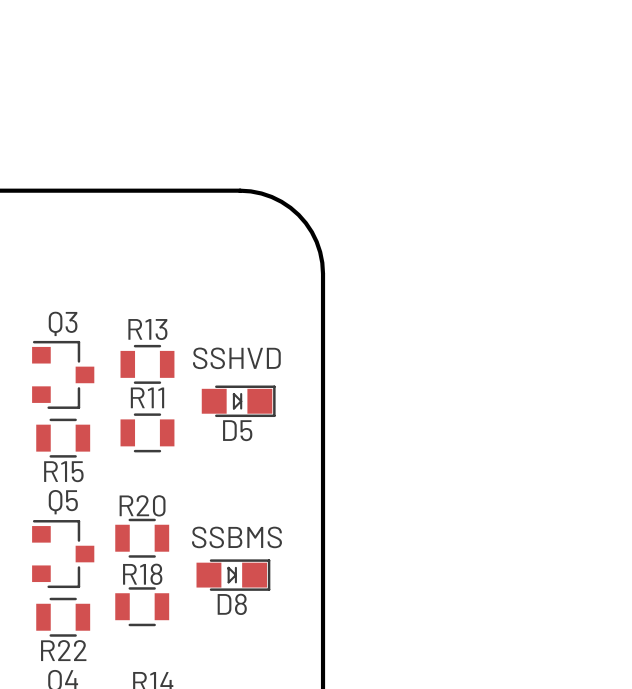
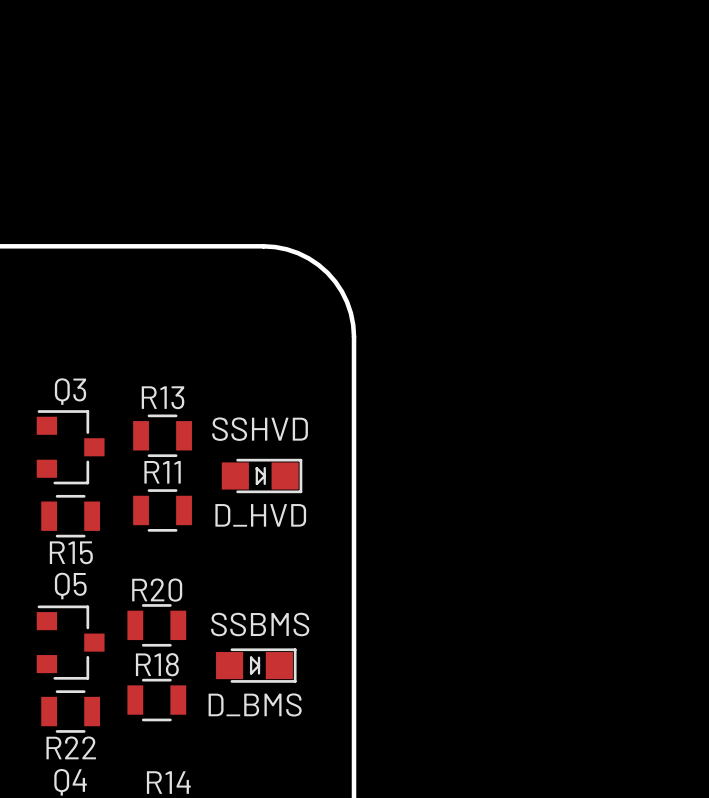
D5 name: D5 (237, 430) -> D_HVD (260, 515)
D8 name: D8 (232, 604) -> D_BMS (255, 704)

